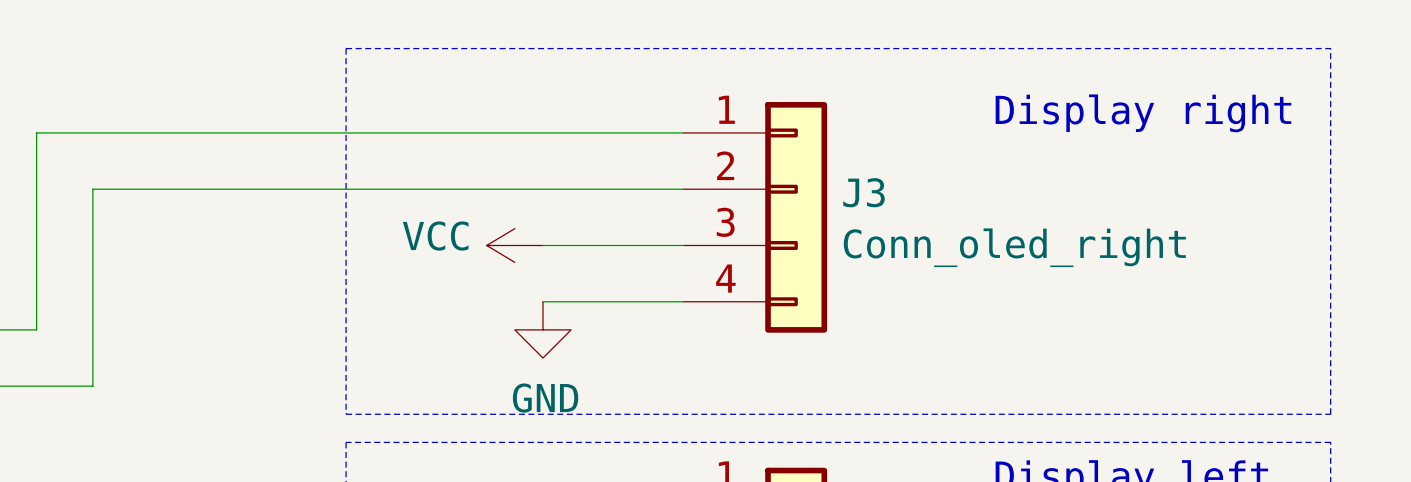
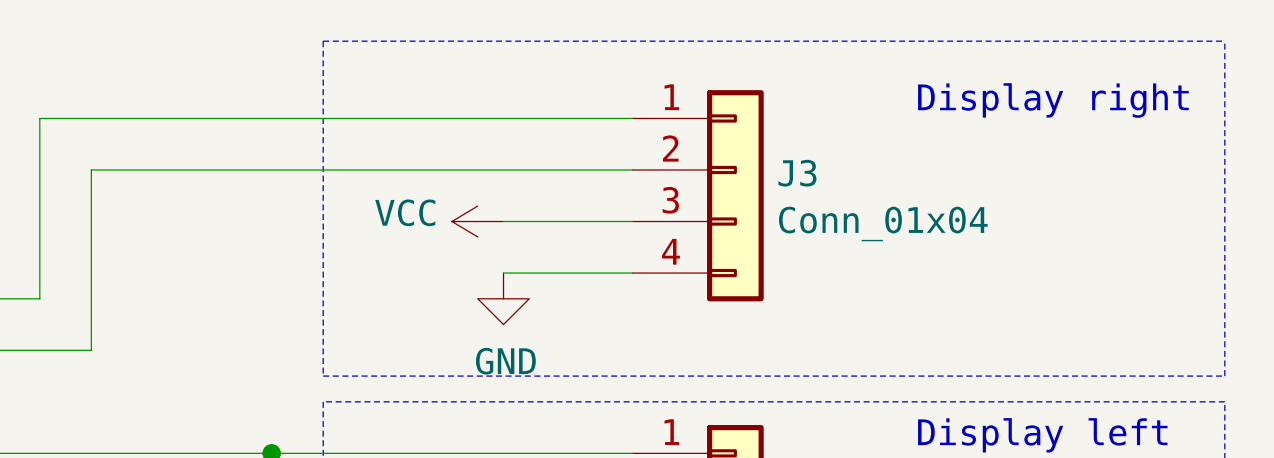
J3 value: Conn_oled_right (1014, 247) -> Conn_01x04 (883, 223)

